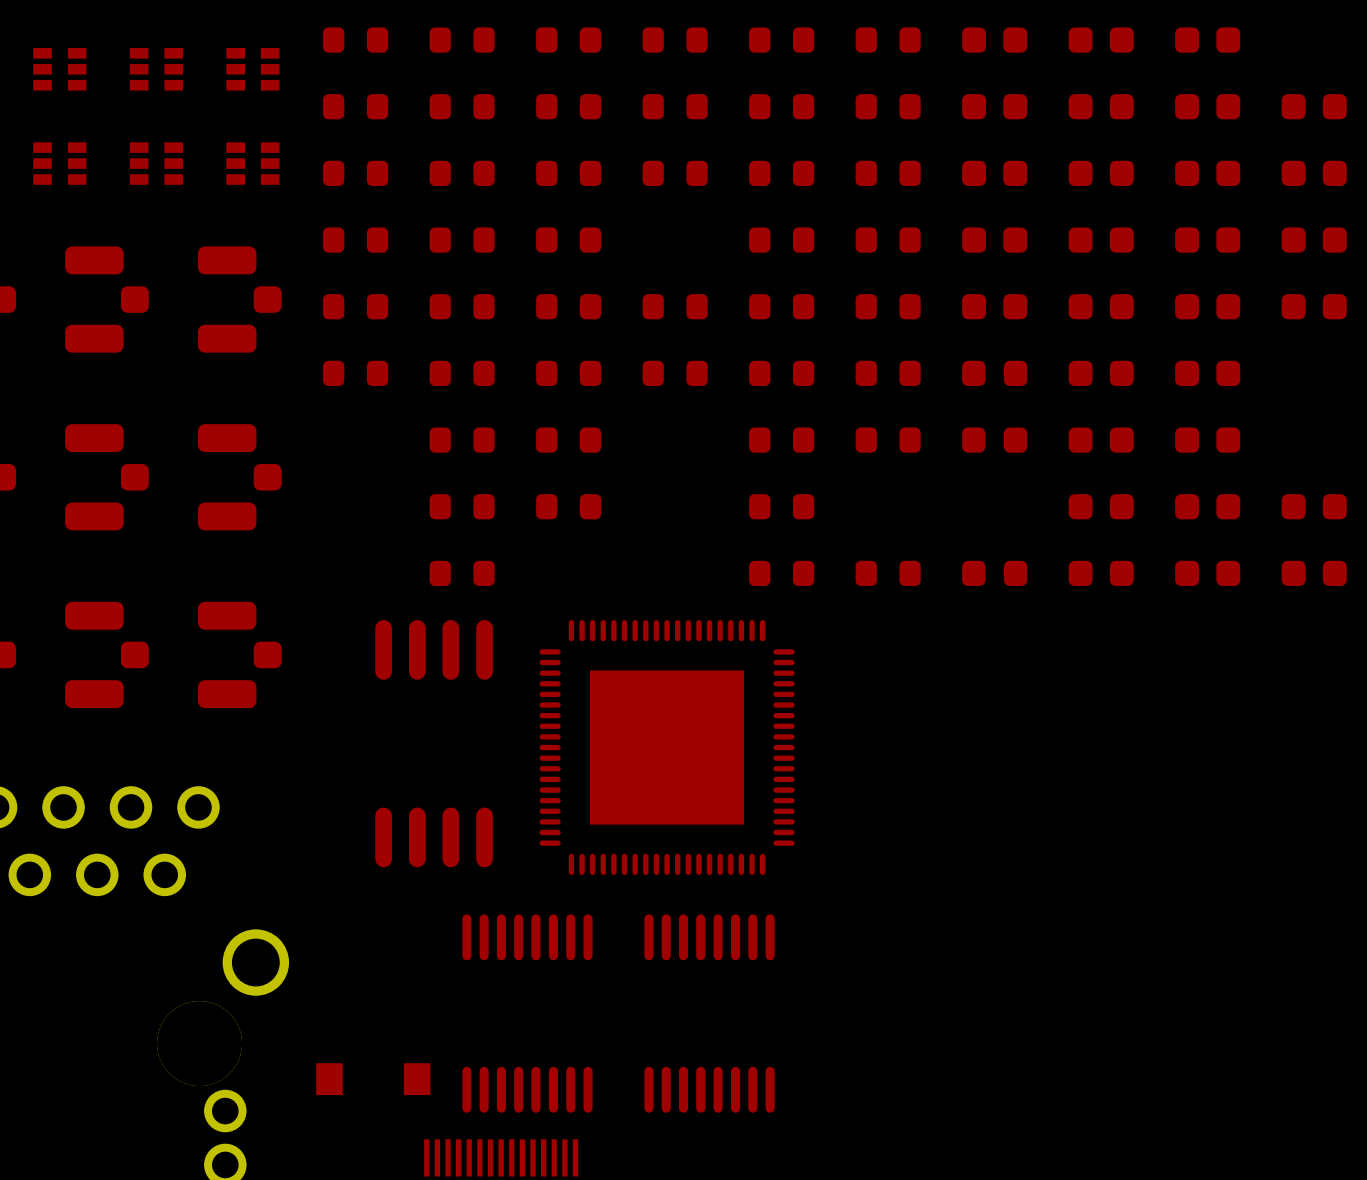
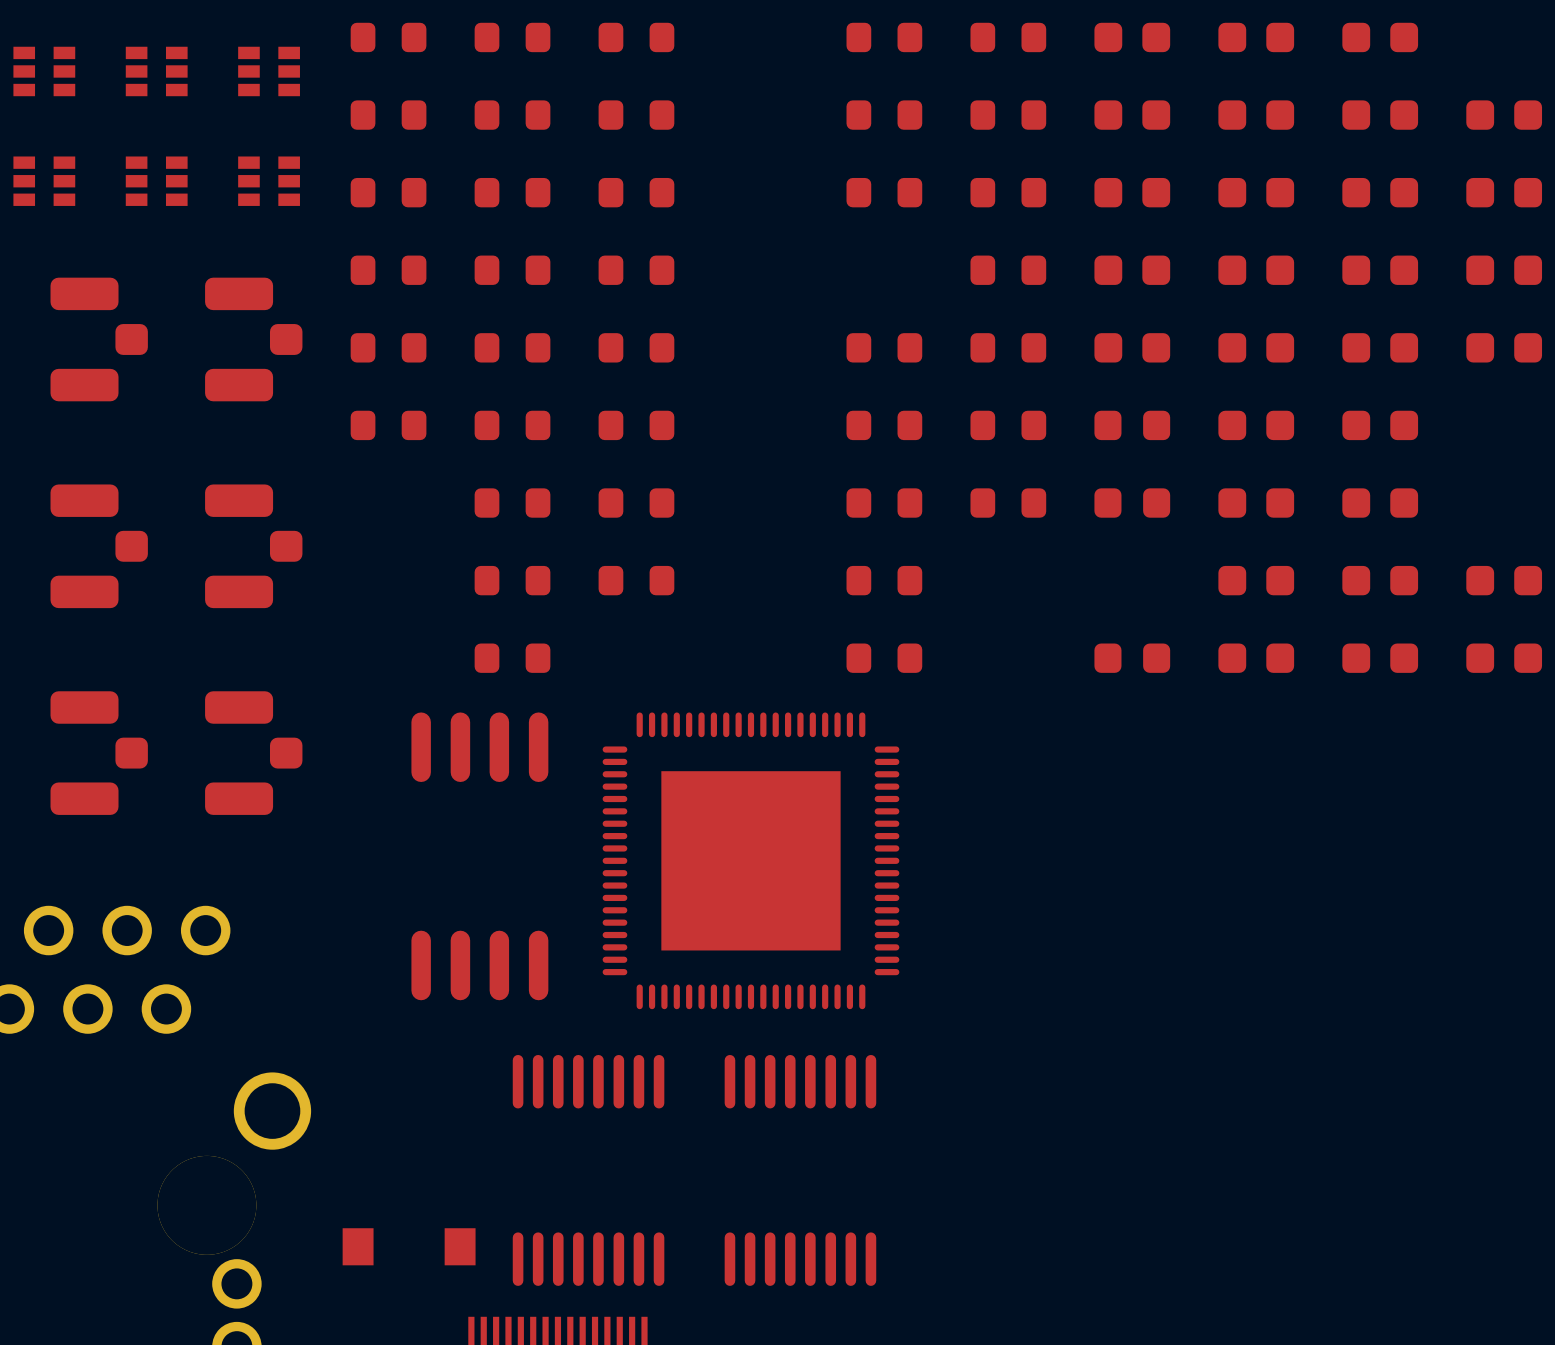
part: (675, 40) -> none
part: (675, 106) -> none
part: (675, 173) -> none
part: (781, 240) -> none
part: (675, 306) -> none
part: (675, 373) -> none
part: (888, 573) -> none

